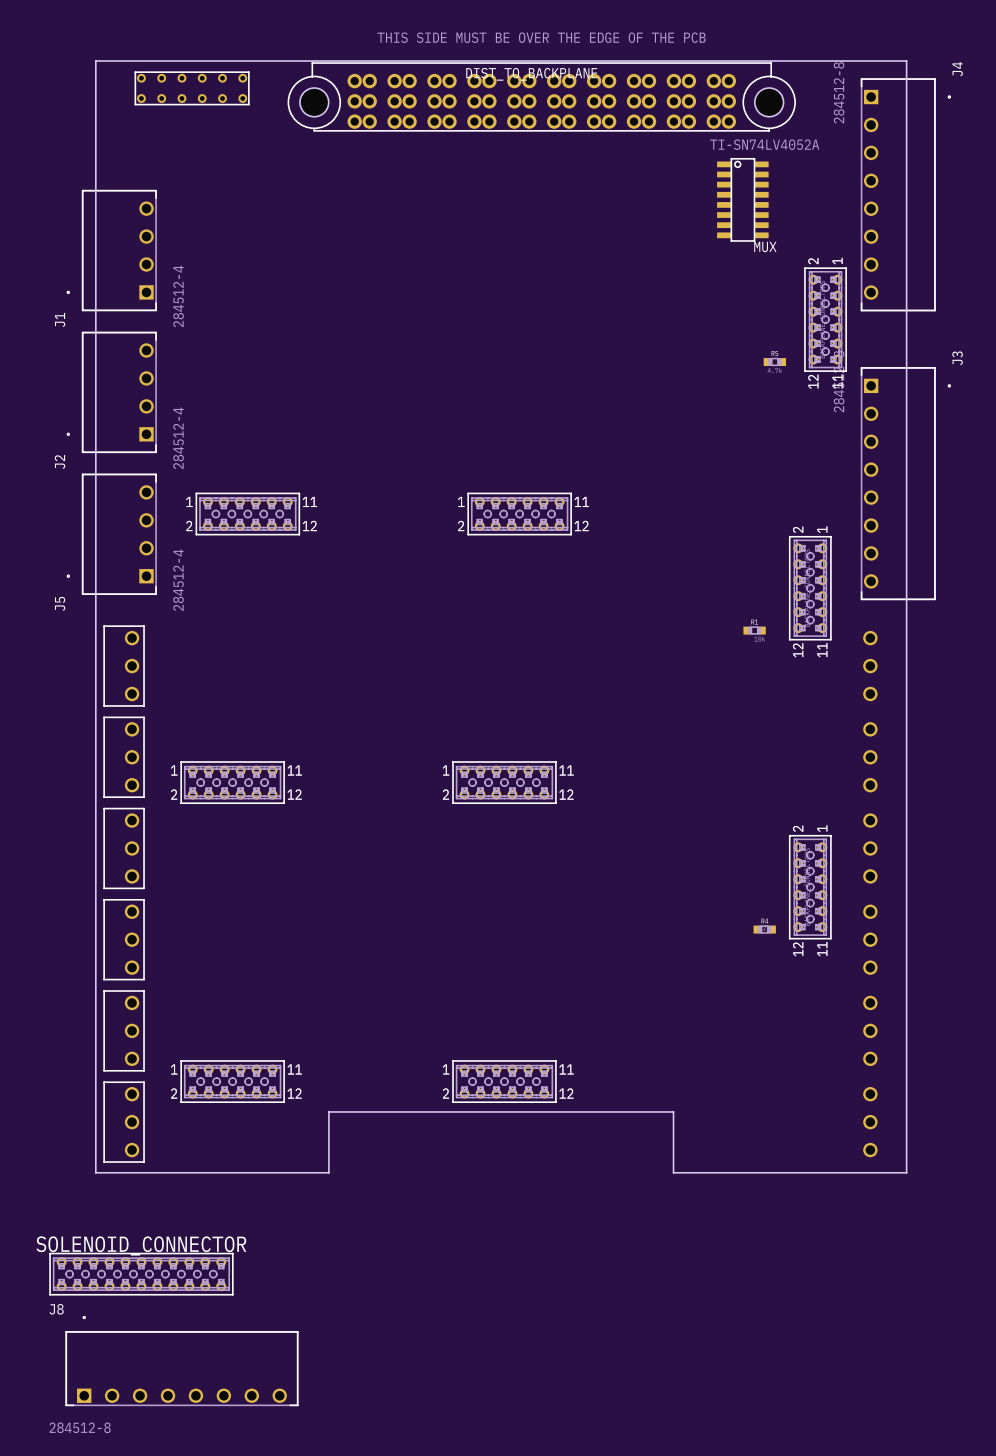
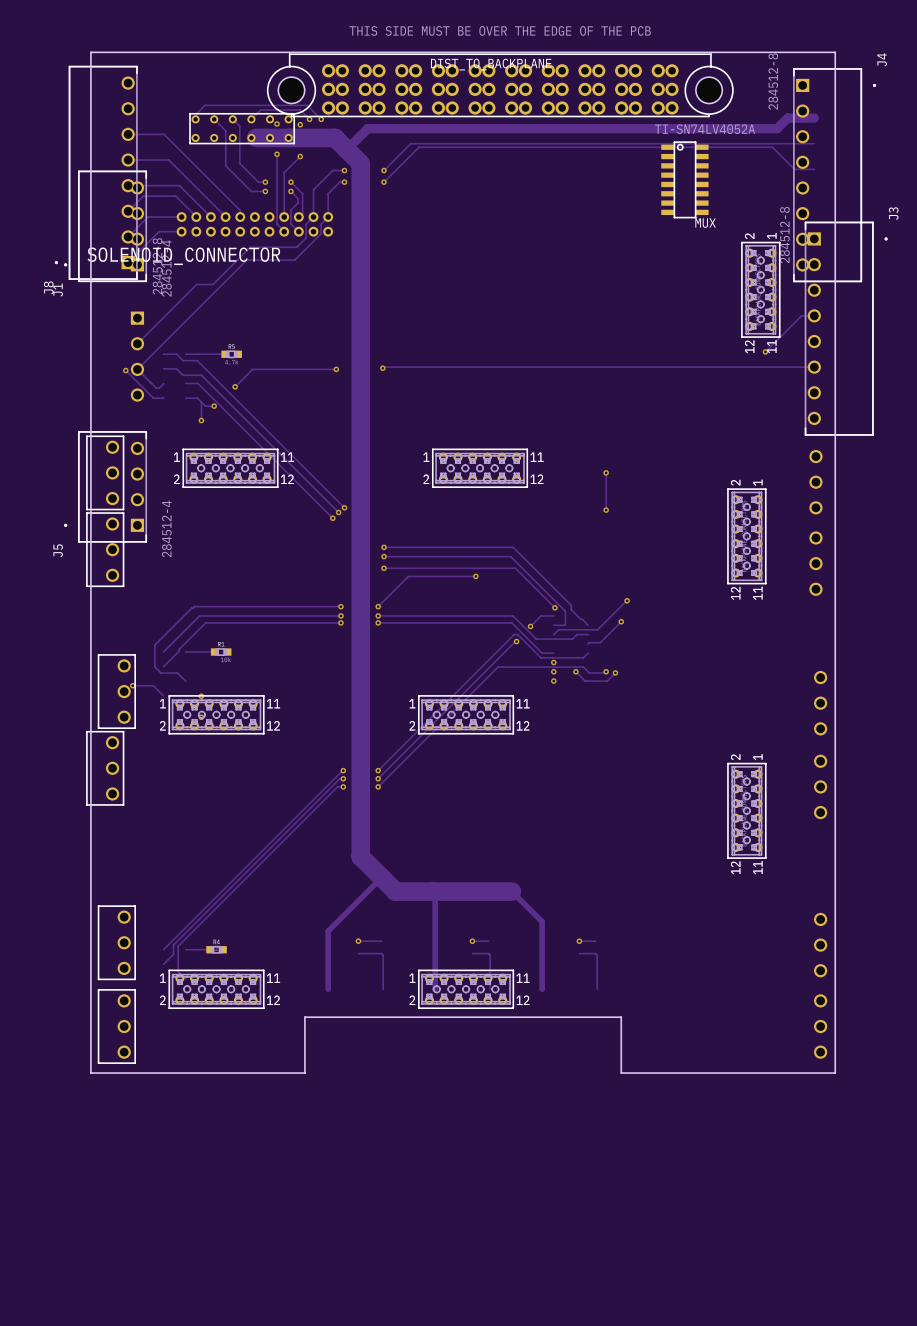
part position: (192, 88) -> (242, 128)
track: none -> (814, 118) (787, 118) (777, 128) (367, 128) (346, 149)
track: none -> (195, 119) (195, 114) (204, 105) (307, 105) (321, 119)
track: none -> (214, 119) (225, 130) (225, 165) (251, 191) (265, 191)
track: none -> (232, 119) (239, 126) (239, 163) (258, 182) (265, 182)
track: none -> (251, 119) (260, 110) (300, 110) (309, 119)
via: none -> (309, 119)
via: none -> (321, 119)
via: none -> (277, 124)
via: none -> (300, 124)
track: none -> (128, 134) (164, 134) (240, 210) (240, 217)
track: none -> (256, 137) (335, 137) (360, 163) (360, 856) (395, 891) (511, 891) (542, 921) (542, 989)
track: none -> (814, 143) (410, 143) (384, 170)
track: none -> (277, 154) (277, 224) (284, 231)
via: none -> (277, 154)
track: none -> (300, 156) (284, 172) (284, 217)
via: none -> (300, 156)
track: none -> (128, 160) (168, 160) (225, 217)
track: none -> (814, 169) (794, 169) (772, 147) (418, 147) (384, 182)
track: none -> (344, 170) (332, 170) (313, 189) (313, 217) (306, 224) (306, 237) (296, 247) (250, 247) (213, 284) (196, 284) (137, 343)
via: none -> (344, 170)
via: none -> (384, 170)
via: none -> (265, 182)
track: none -> (290, 182) (302, 193) (302, 213) (298, 217)
via: none -> (290, 182)
track: none -> (344, 182) (339, 182) (328, 193) (328, 217) (321, 224) (321, 233) (294, 260) (246, 260) (137, 369) (156, 388) (159, 388) (163, 383)
via: none -> (344, 182)
via: none -> (384, 182)
track: none -> (128, 185) (179, 185) (210, 217)
via: none -> (265, 191)
track: none -> (290, 191) (297, 198) (297, 203) (291, 210) (290, 224) (298, 231)
via: none -> (290, 191)
track: none -> (128, 211) (143, 196) (175, 196) (196, 217)
track: none -> (181, 217) (148, 217) (128, 236)
SOLENOID_CONNECTOR: none -> (254, 224)
track: none -> (181, 231) (159, 231) (128, 262)
track: none -> (814, 315) (801, 315) (765, 351)
part position: (774, 362) -> (231, 354)
via: none -> (765, 351)
track: none -> (163, 354) (176, 354) (183, 360) (197, 360) (344, 507)
track: none -> (185, 354) (225, 354)
J2 side: top (111, 392) -> bottom (137, 356)
track: none -> (814, 367) (382, 368)
track: none -> (163, 368) (176, 368) (183, 375) (201, 375) (338, 512)
via: none -> (382, 368)
track: none -> (336, 369) (252, 369) (235, 386)
via: none -> (336, 369)
track: none -> (125, 370) (153, 398) (163, 397)
via: none -> (125, 370)
track: none -> (185, 383) (198, 383) (332, 518)
via: none -> (235, 386)
track: none -> (185, 398) (197, 398) (205, 406) (214, 406)
track: none -> (201, 401) (201, 420)
via: none -> (214, 406)
via: none -> (201, 420)
J3 position: (906, 483) -> (846, 328)
part: none -> (105, 472)
track: none -> (606, 472) (606, 510)
via: none -> (606, 472)
part: none -> (815, 482)
via: none -> (344, 507)
via: none -> (606, 510)
via: none -> (338, 512)
via: none -> (332, 518)
track: none -> (384, 547) (513, 547) (571, 605) (571, 609) (588, 625)
via: none -> (384, 547)
track: none -> (384, 556) (510, 556) (565, 611) (565, 625) (553, 625)
via: none -> (384, 556)
track: none -> (384, 568) (515, 568) (554, 607)
via: none -> (384, 568)
part position: (754, 630) -> (221, 652)
track: none -> (475, 576) (408, 576) (378, 606)
via: none -> (475, 576)
track: none -> (627, 600) (597, 629) (558, 629) (553, 634)
via: none -> (627, 600)
track: none -> (340, 606) (194, 606) (154, 645) (154, 666) (160, 673) (177, 673) (185, 681)
via: none -> (340, 606)
via: none -> (378, 606)
part position: (124, 666) -> (105, 549)
via: none -> (554, 607)
part position: (870, 666) -> (815, 563)
track: none -> (340, 615) (199, 615) (163, 651)
via: none -> (340, 615)
track: none -> (378, 615) (513, 615) (536, 639) (572, 639) (577, 634) (588, 634)
via: none -> (378, 615)
track: none -> (553, 615) (541, 615) (530, 626)
track: none -> (621, 621) (600, 642) (588, 643)
via: none -> (621, 621)
track: none -> (340, 622) (205, 622) (163, 666)
via: none -> (340, 622)
track: none -> (378, 622) (511, 622) (542, 653) (553, 653)
via: none -> (378, 622)
via: none -> (530, 626)
track: none -> (516, 641) (378, 778)
via: none -> (516, 641)
track: none -> (185, 651) (214, 651)
track: none -> (588, 653) (583, 657) (541, 657) (517, 634) (514, 634) (378, 770)
via: none -> (553, 662)
via: none -> (553, 671)
track: none -> (575, 671) (585, 681) (607, 681) (615, 672)
via: none -> (575, 671)
track: none -> (606, 671) (589, 672) (583, 667) (497, 667) (378, 786)
via: none -> (606, 671)
via: none -> (615, 672)
via: none -> (553, 681)
track: none -> (132, 685) (153, 685) (163, 695)
via: none -> (132, 685)
part position: (870, 757) -> (820, 703)
via: none -> (201, 696)
via: none -> (201, 717)
track: none -> (343, 770) (163, 949)
via: none -> (343, 770)
via: none -> (378, 770)
part position: (124, 848) -> (105, 768)
part position: (870, 848) -> (820, 786)
track: none -> (343, 778) (339, 778) (173, 945) (173, 954) (163, 964)
via: none -> (343, 778)
via: none -> (378, 778)
track: none -> (343, 786) (337, 786) (178, 946) (178, 971) (185, 978)
via: none -> (343, 786)
via: none -> (378, 786)
part position: (764, 929) -> (216, 949)
part: (124, 939) -> none
part: (870, 939) -> none
track: none -> (381, 877) (328, 931) (328, 989)
track: none -> (432, 891) (435, 893) (435, 989)
track: none -> (358, 941) (381, 941)
via: none -> (358, 941)
track: none -> (472, 941) (488, 941)
via: none -> (472, 941)
track: none -> (579, 941) (595, 941)
via: none -> (579, 941)
part position: (870, 1030) -> (820, 945)
track: none -> (185, 949) (210, 949)
track: none -> (358, 953) (383, 955) (383, 989)
track: none -> (472, 953) (490, 955) (490, 989)
track: none -> (579, 953) (597, 955) (597, 989)
part position: (870, 1122) -> (820, 1026)
SOLENOID_CONNECTOR: (141, 1274) -> none
J8 rotation: 0° (181, 1360) -> 90° counterclockwise (96, 172)
J8 position: (181, 1360) -> (96, 172)

